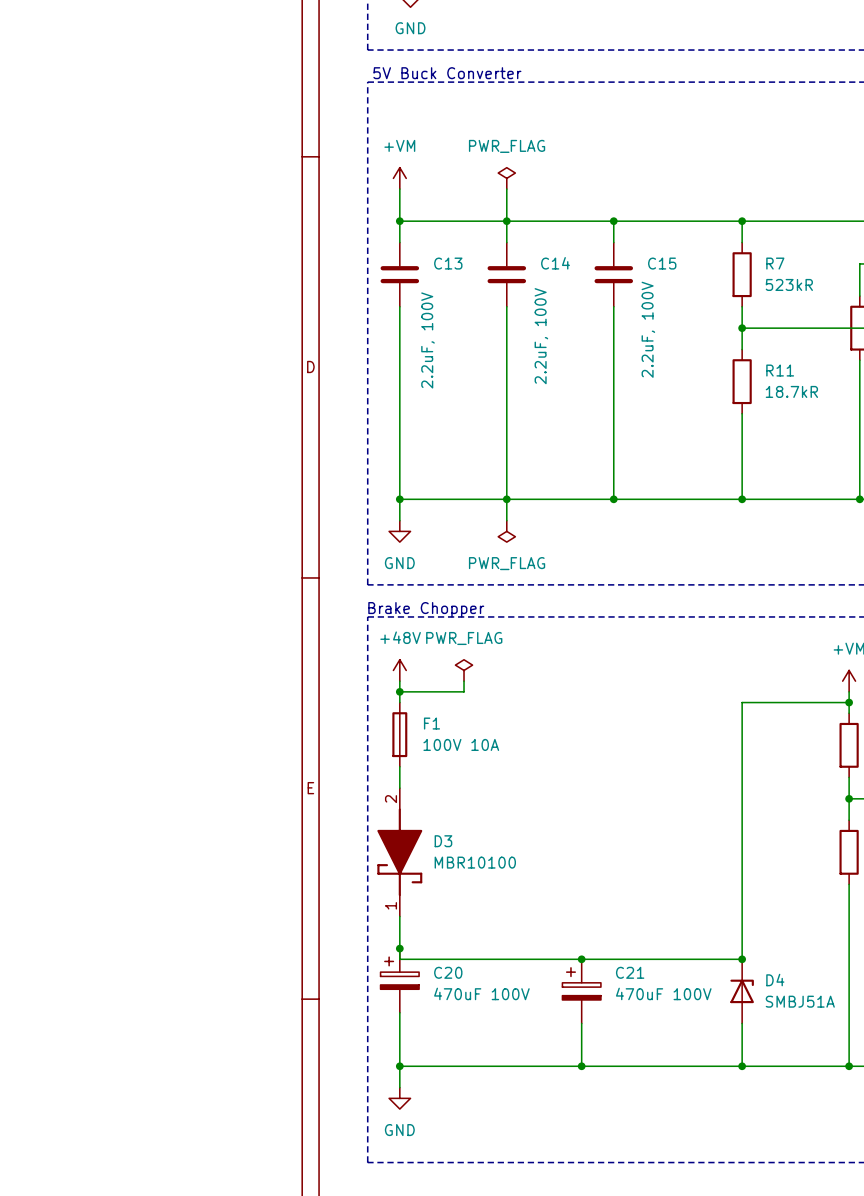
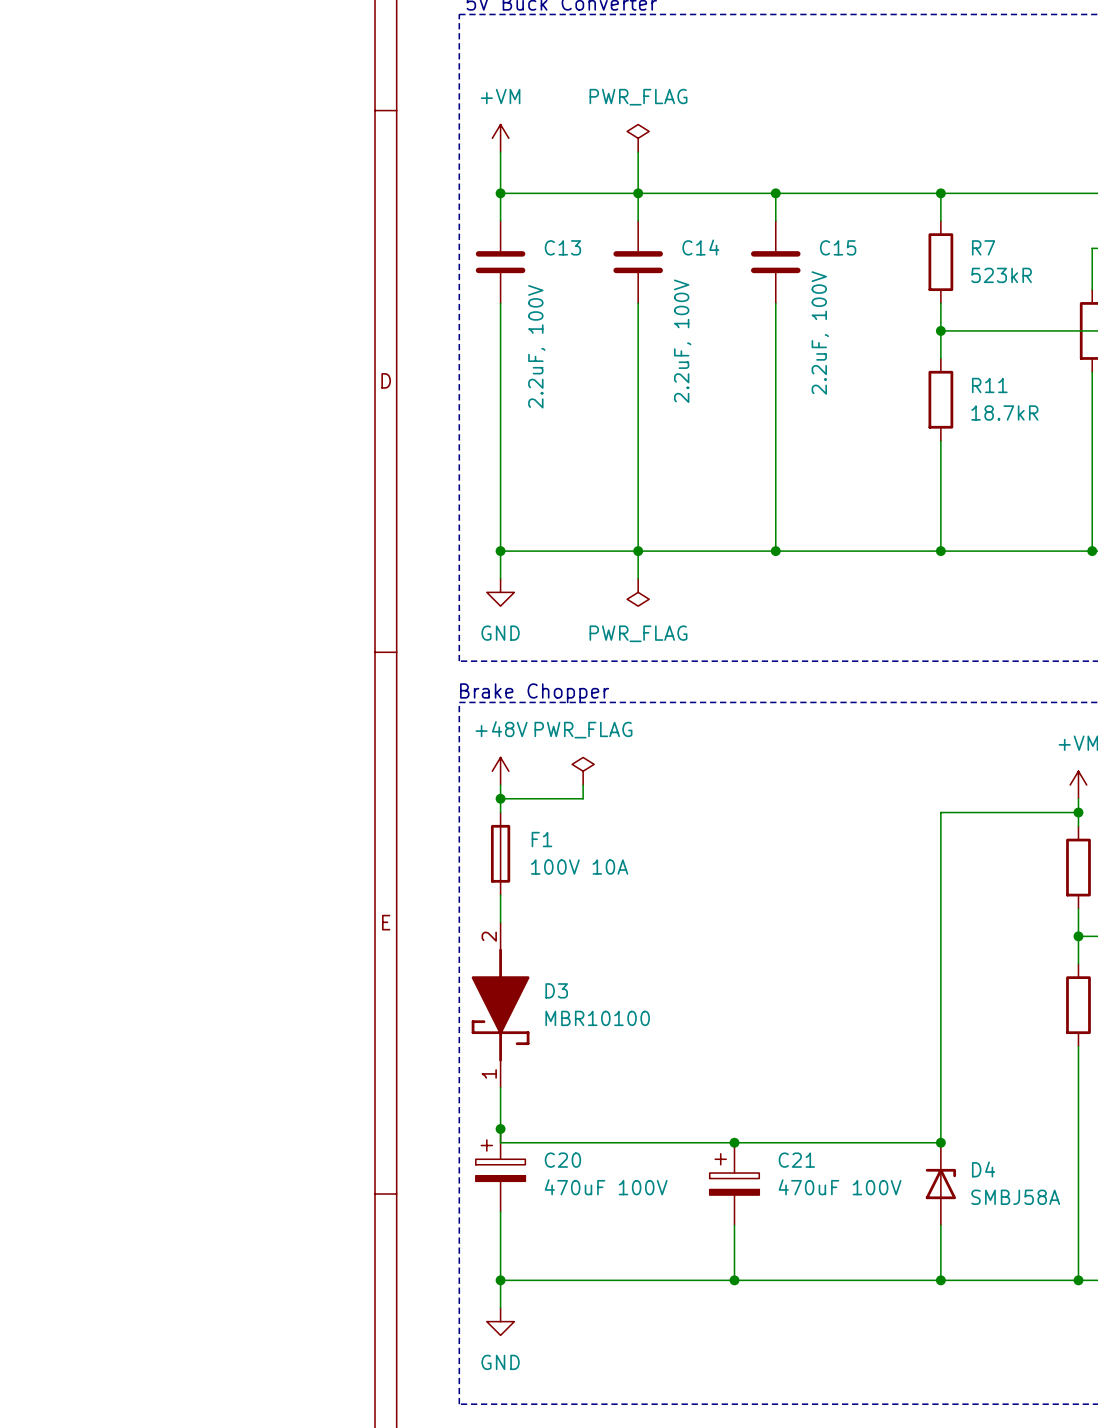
D4 value: SMBJ51A (800, 1001) -> SMBJ58A (1015, 1197)

